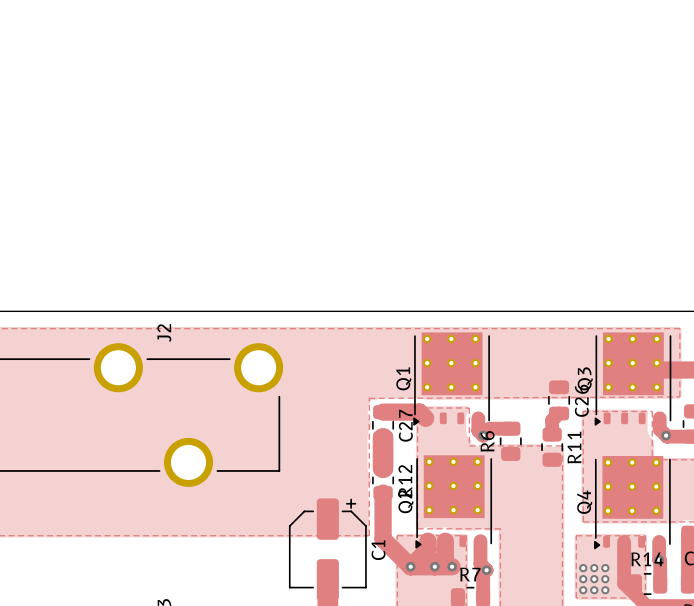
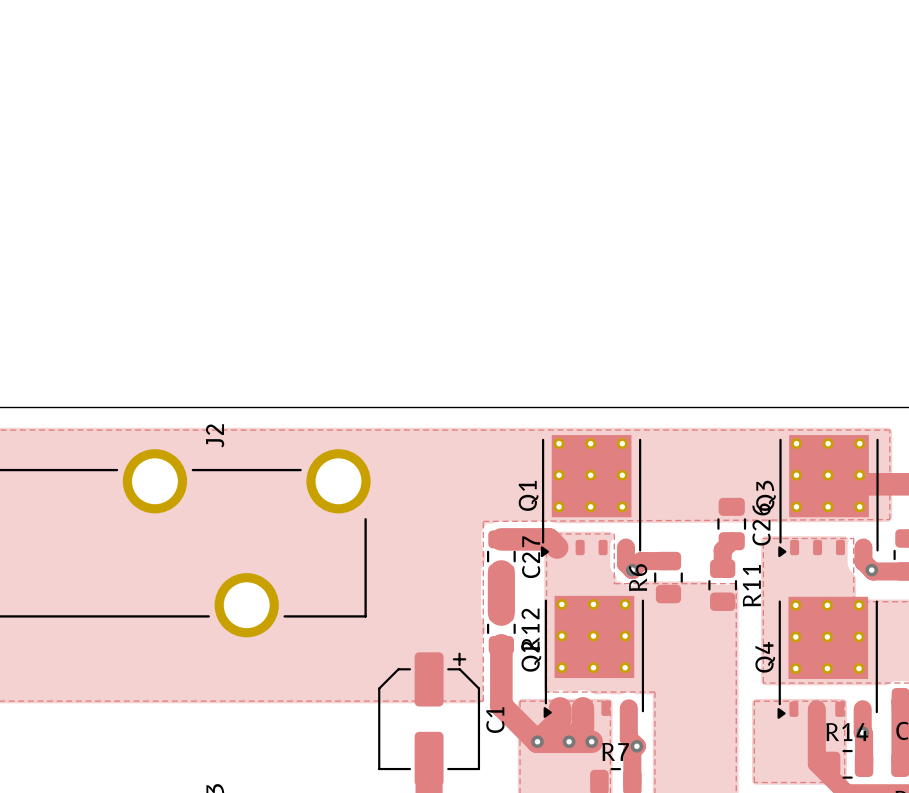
via: (583, 568) -> none
via: (594, 568) -> none
via: (605, 568) -> none
via: (583, 579) -> none
via: (594, 579) -> none
via: (605, 579) -> none
via: (583, 590) -> none
via: (594, 590) -> none
via: (605, 590) -> none

